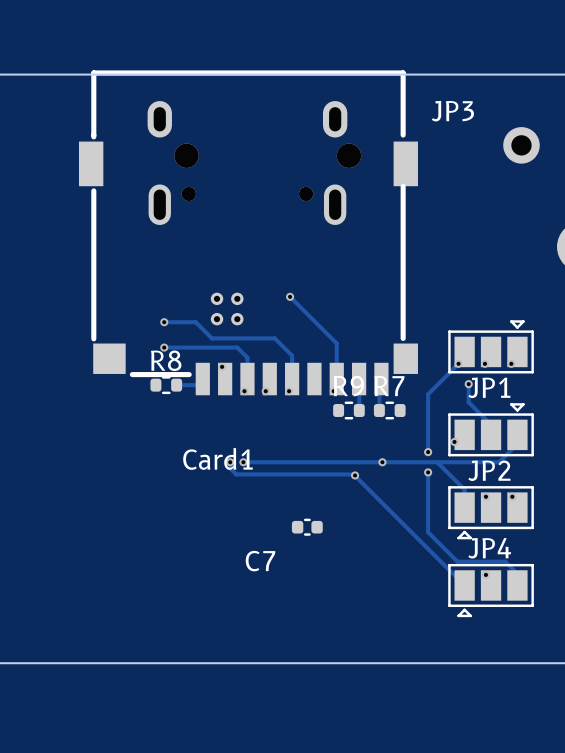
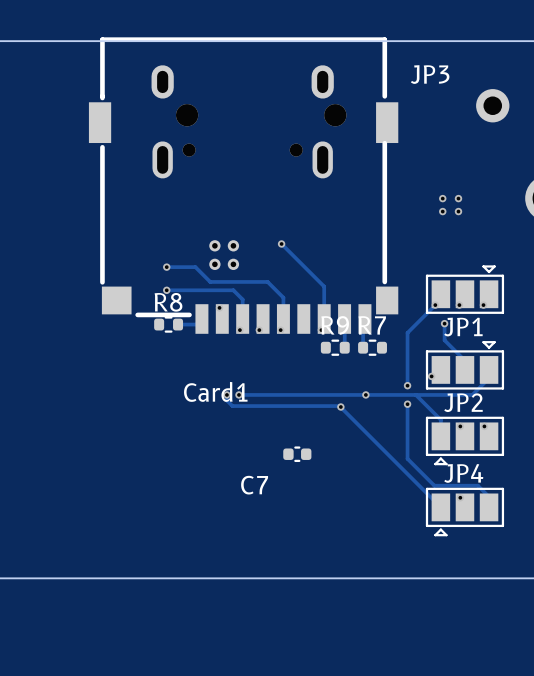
via: none -> (442, 198)
via: none -> (458, 198)
via: none -> (442, 211)
via: none -> (458, 211)

